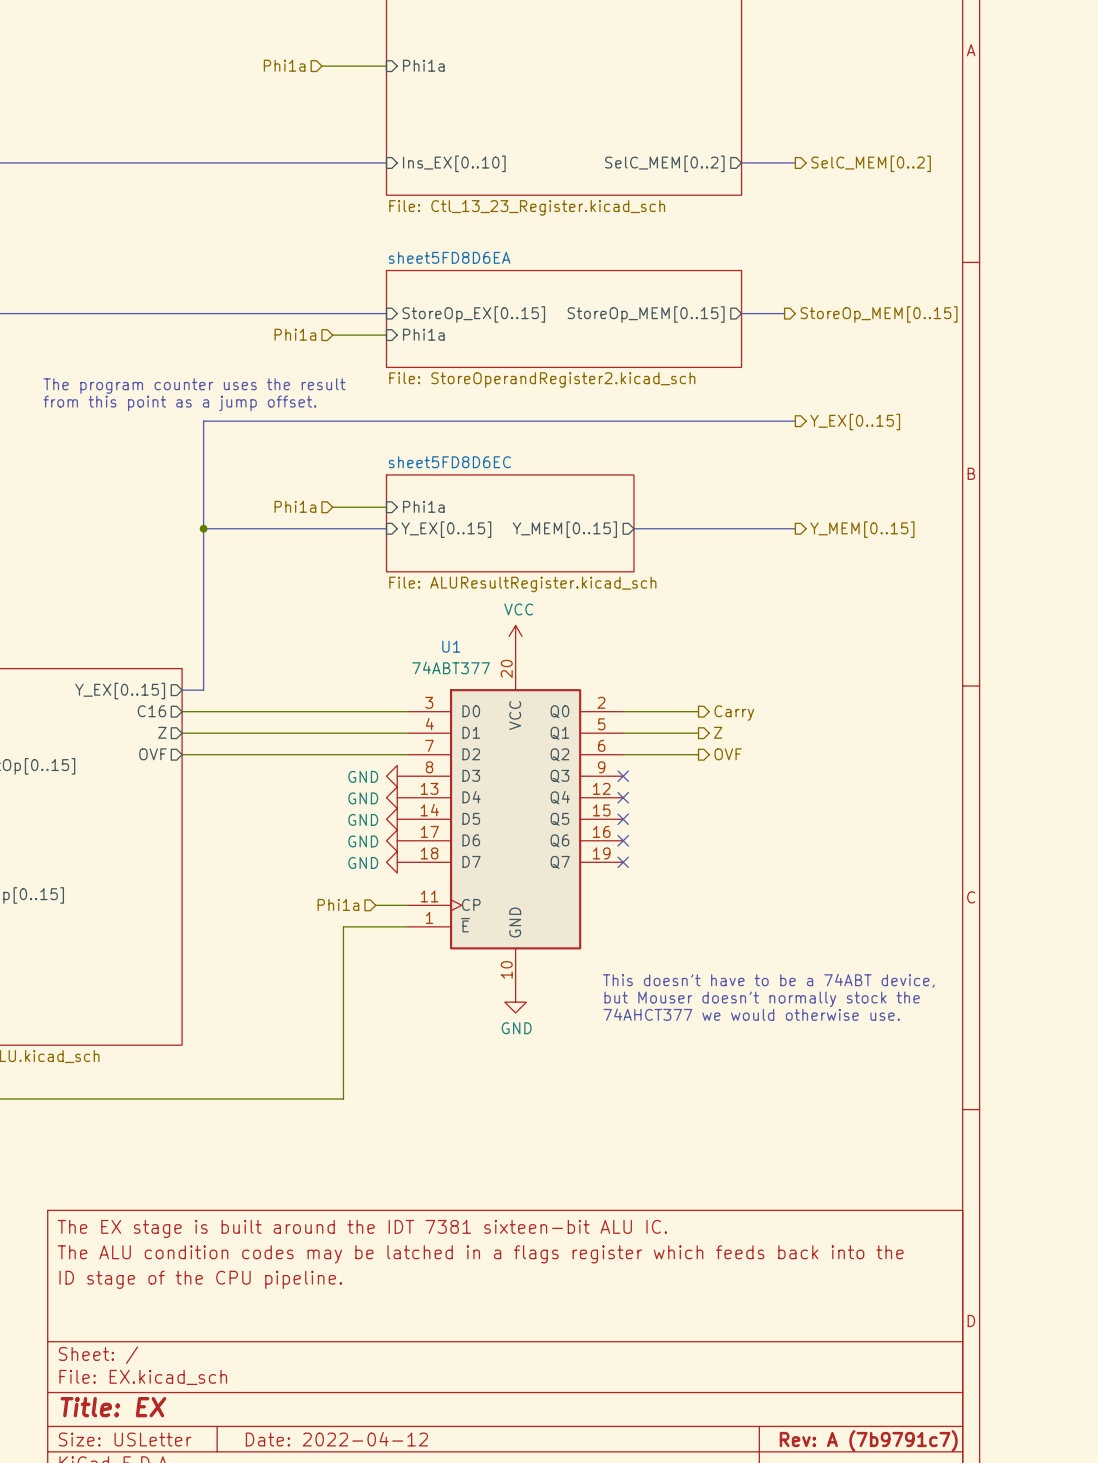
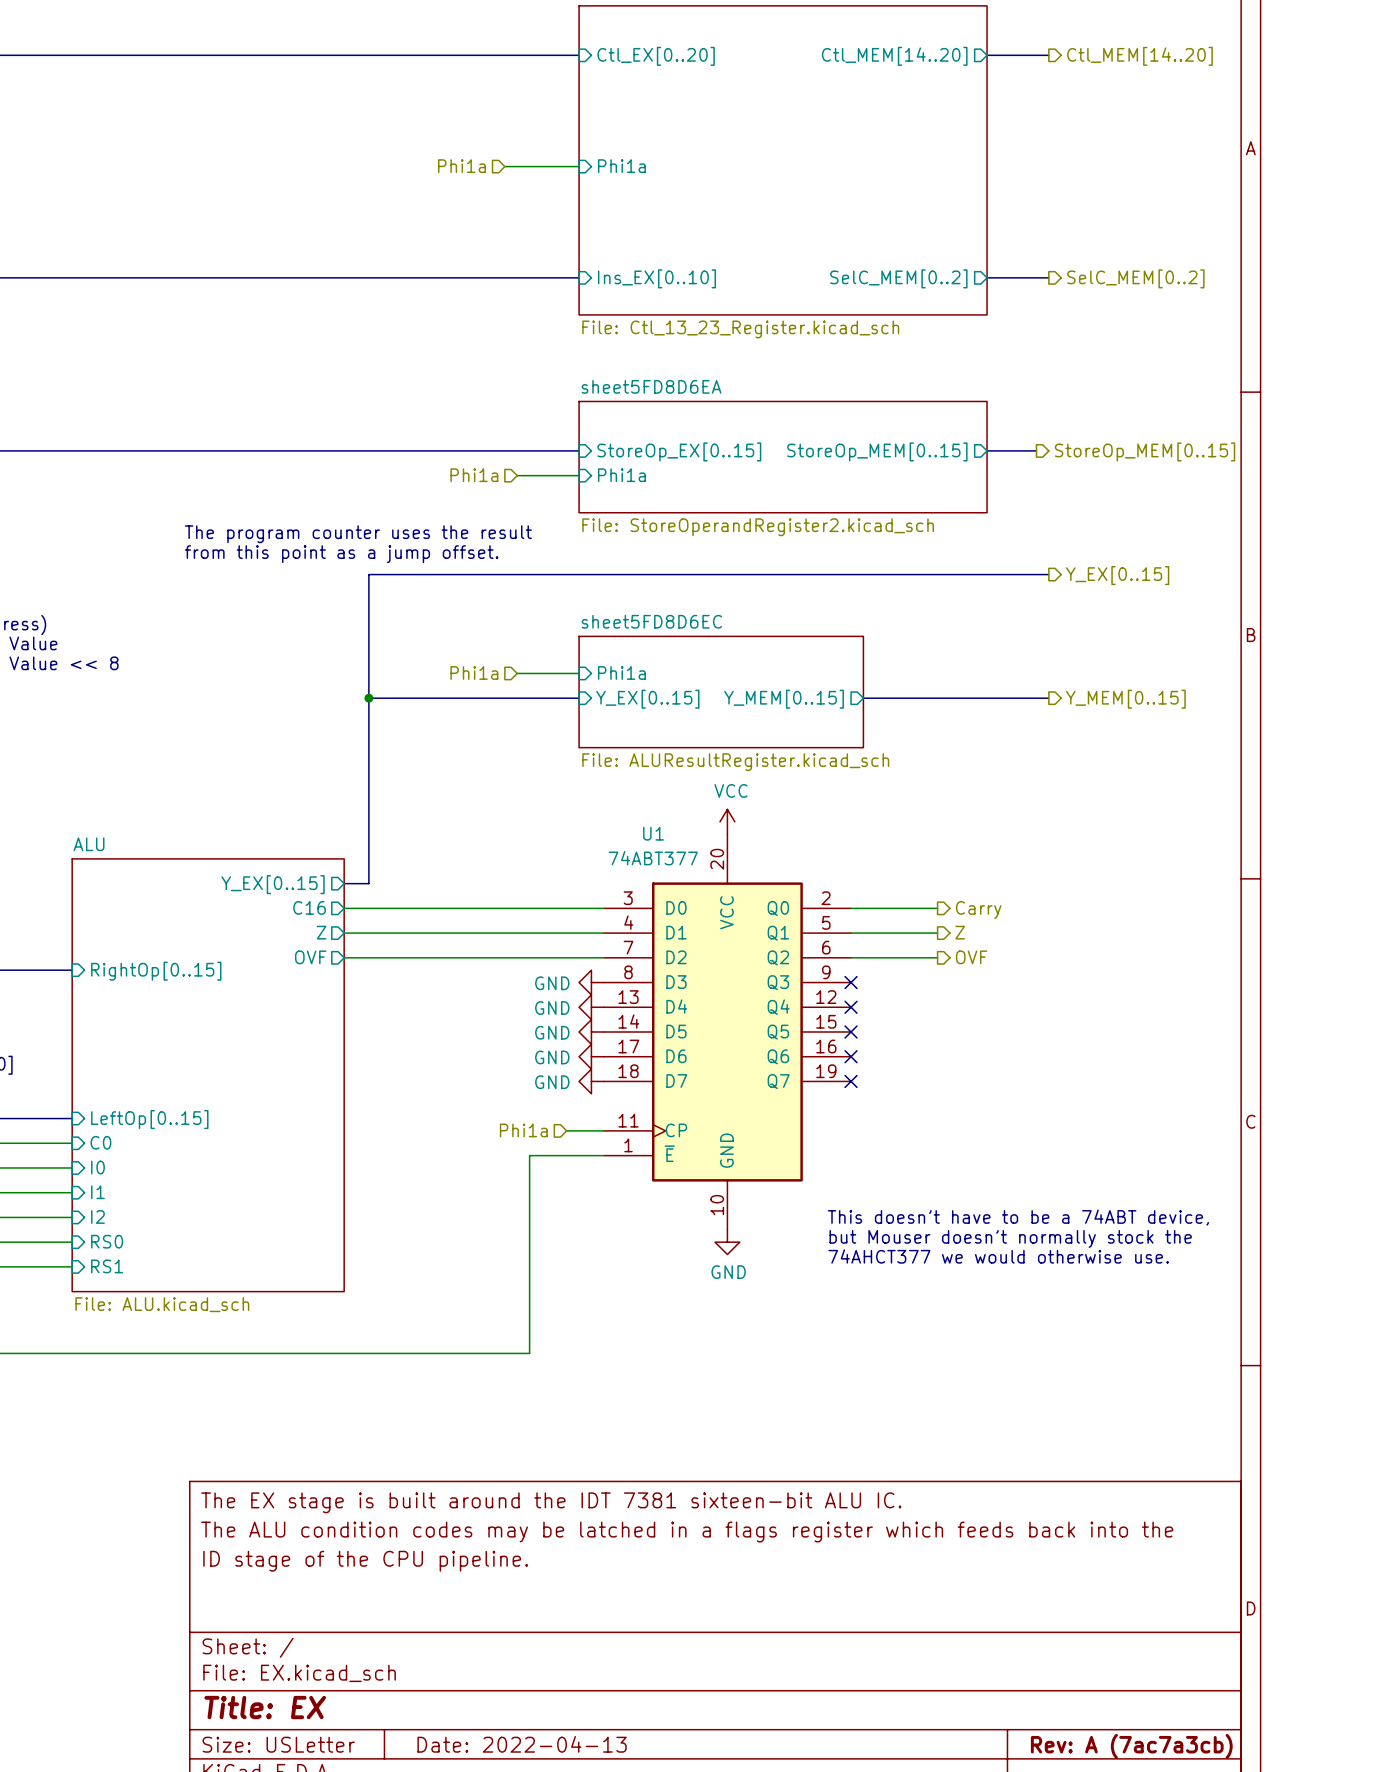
title block: Date: 2022-04-12 (336, 1439) -> Date: 2022-04-13 (522, 1744)
title block: Rev: A (7b9791c7) (868, 1441) -> Rev: A (7ac7a3cb) (1131, 1746)

